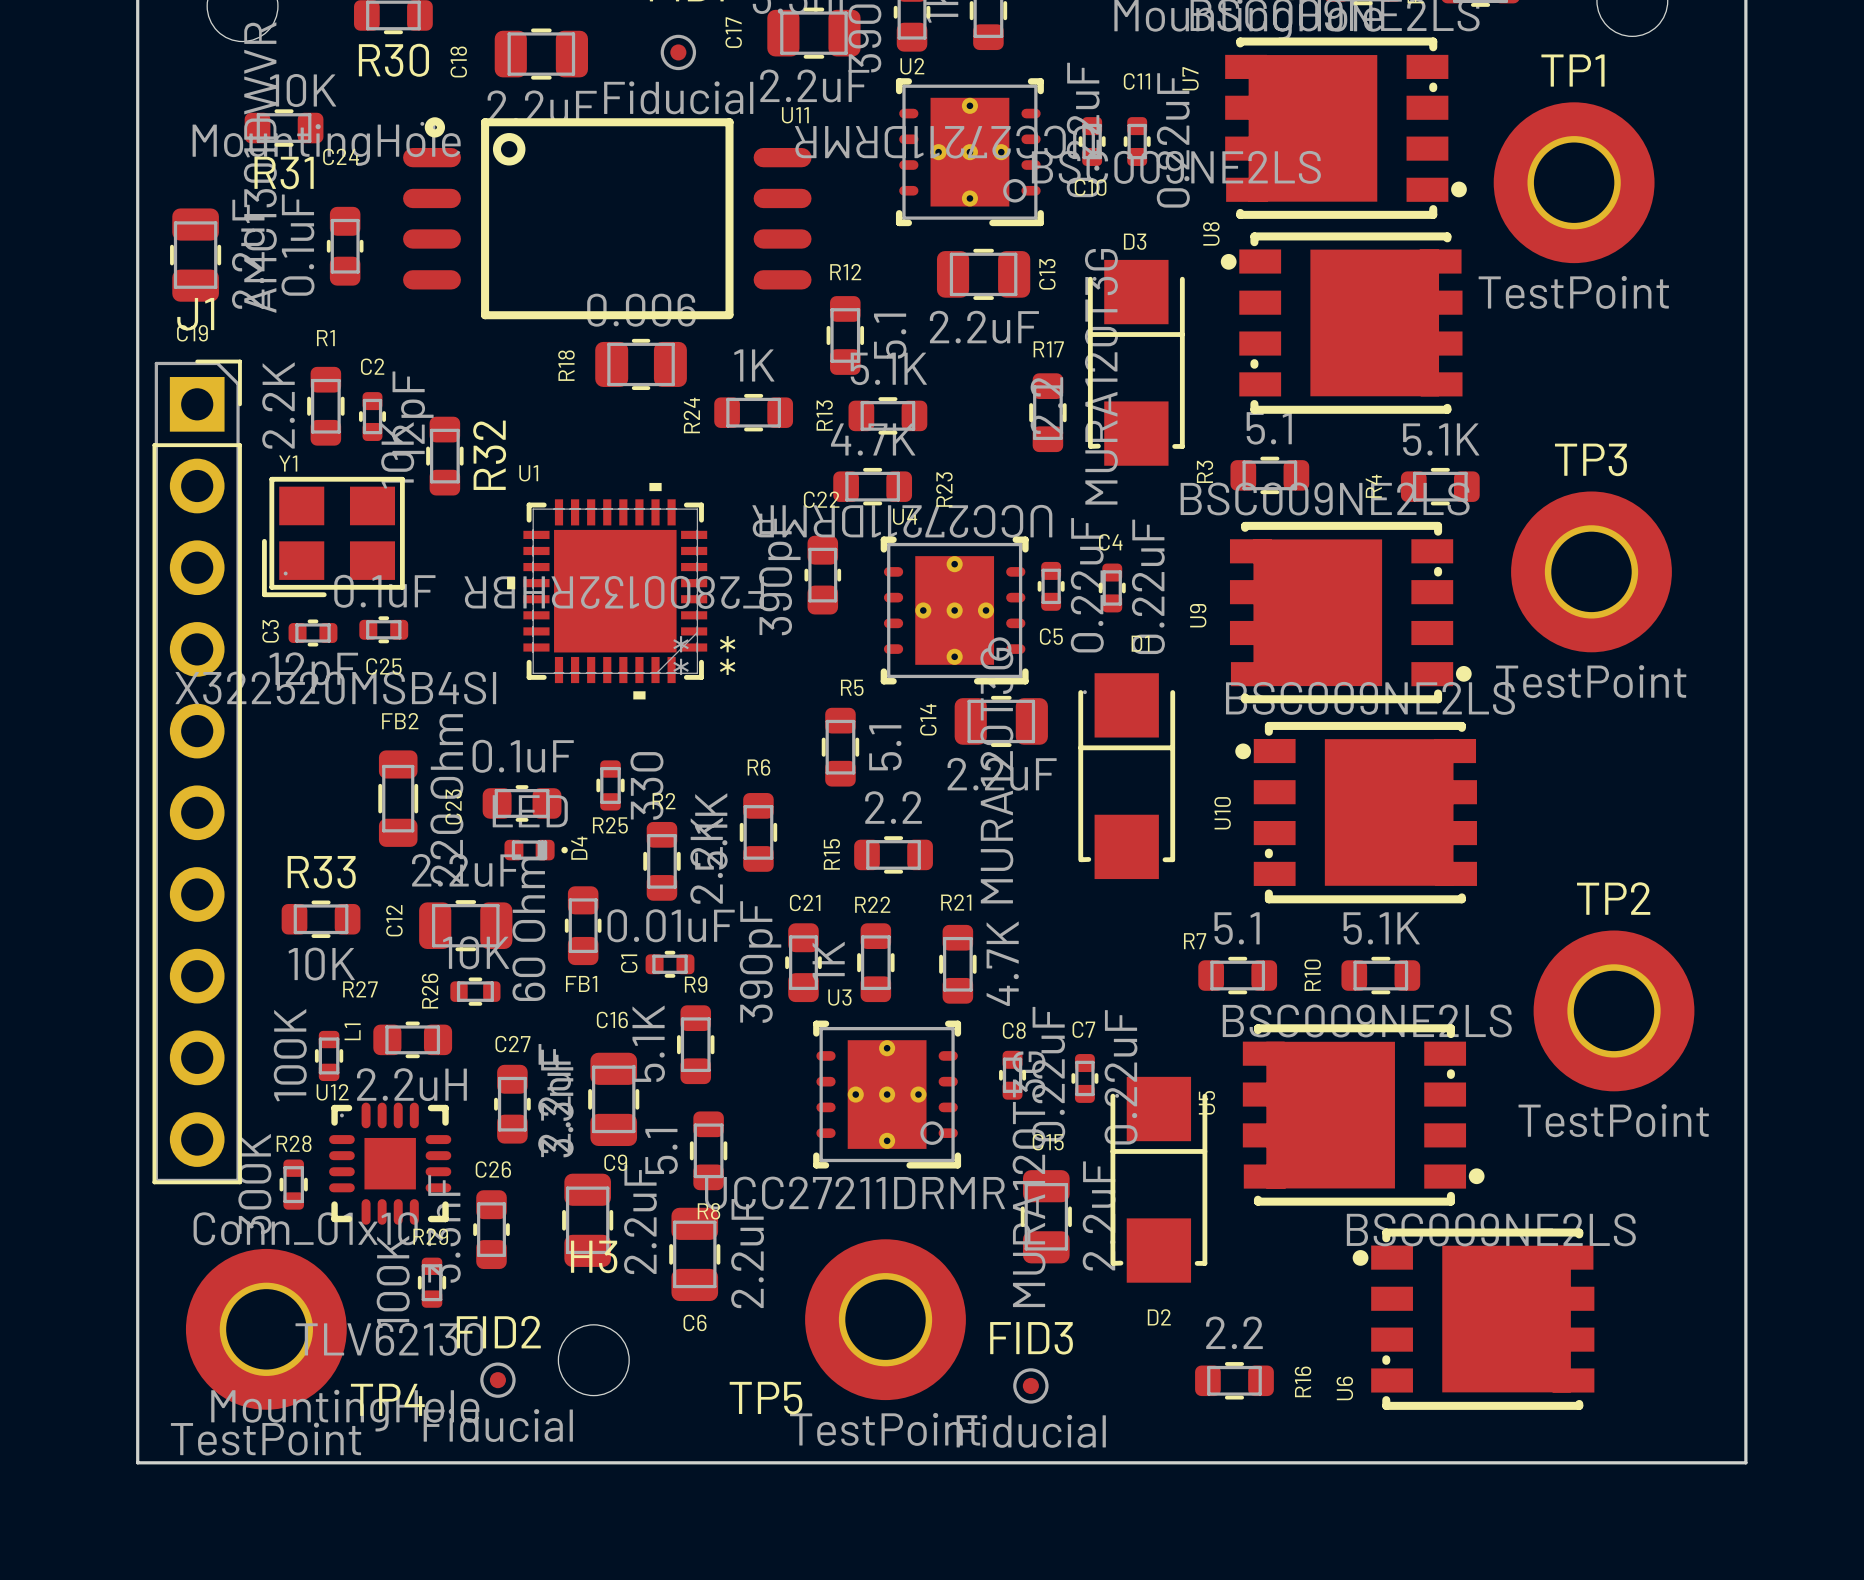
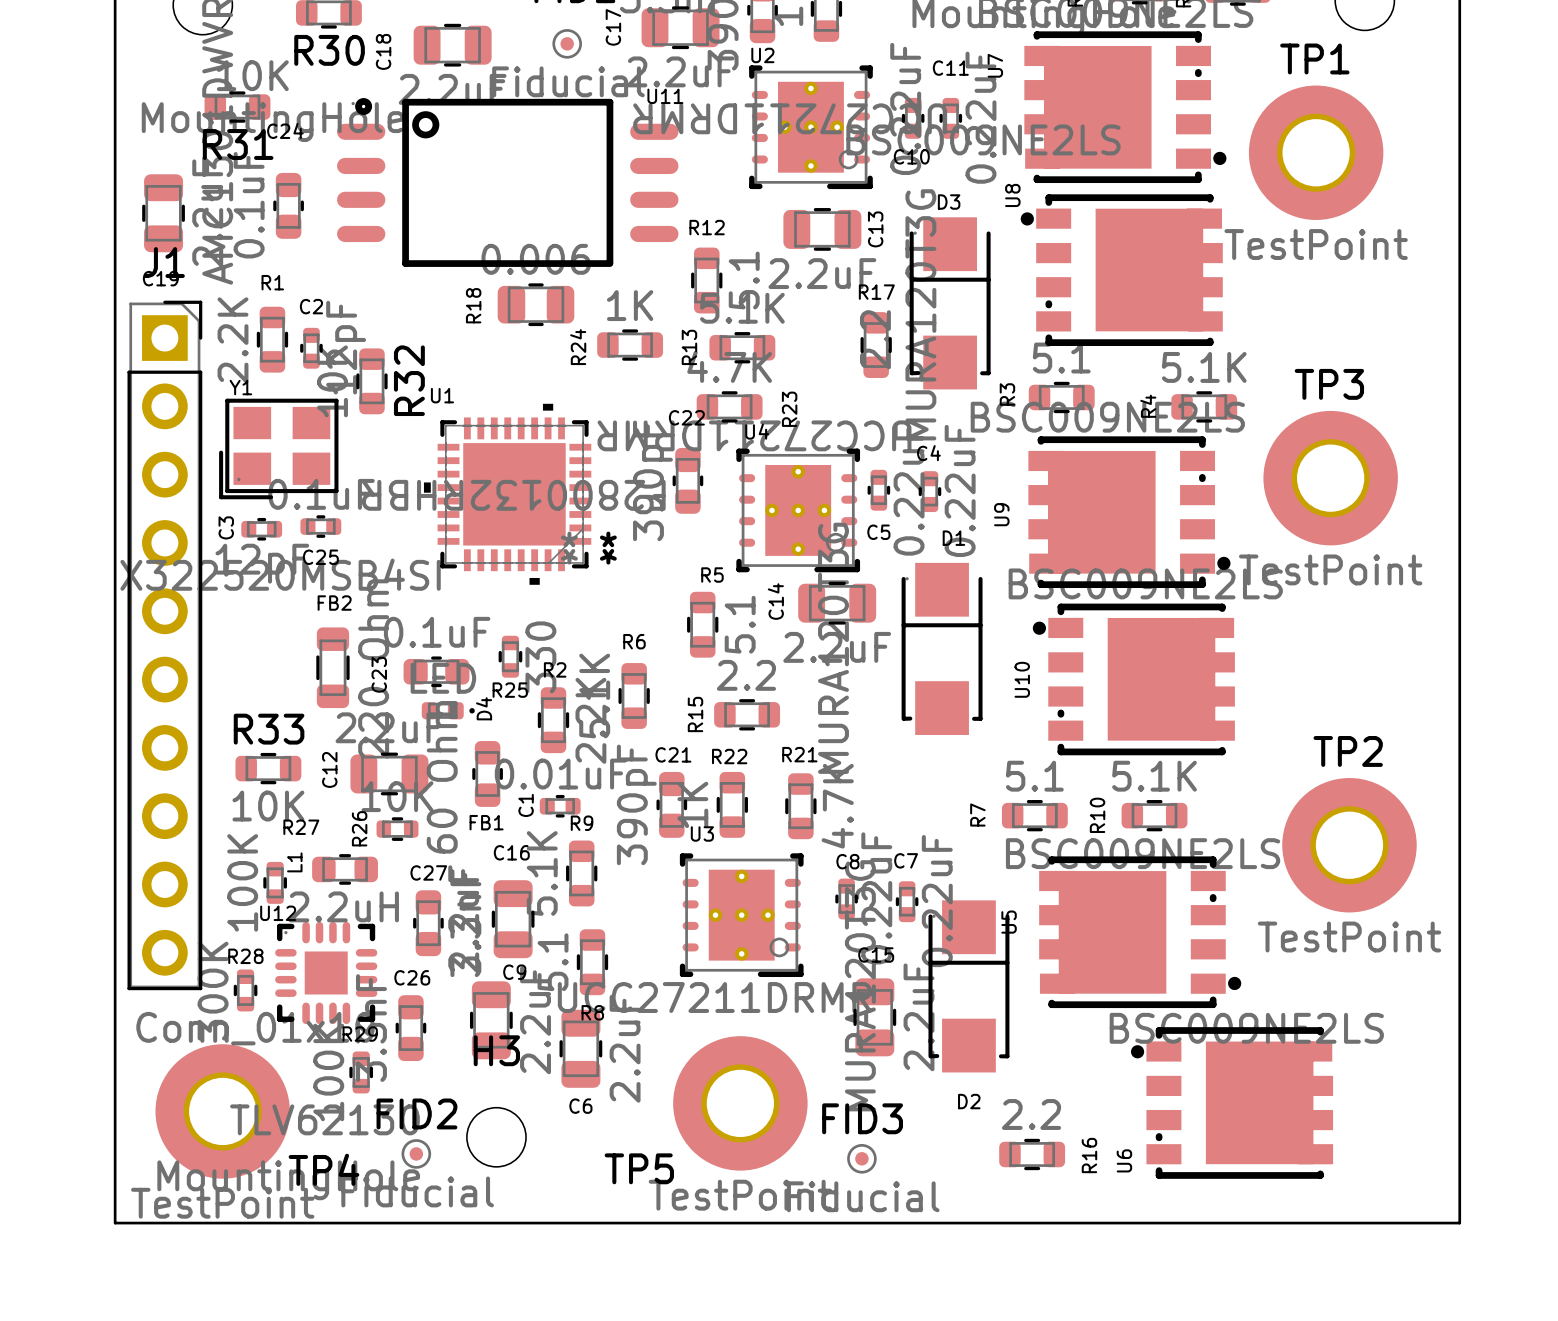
R7 name rotation: 0° (1195, 941) -> 90° counterclockwise (977, 815)
R7 name position: R7 (1195, 941) -> R7 (977, 815)

